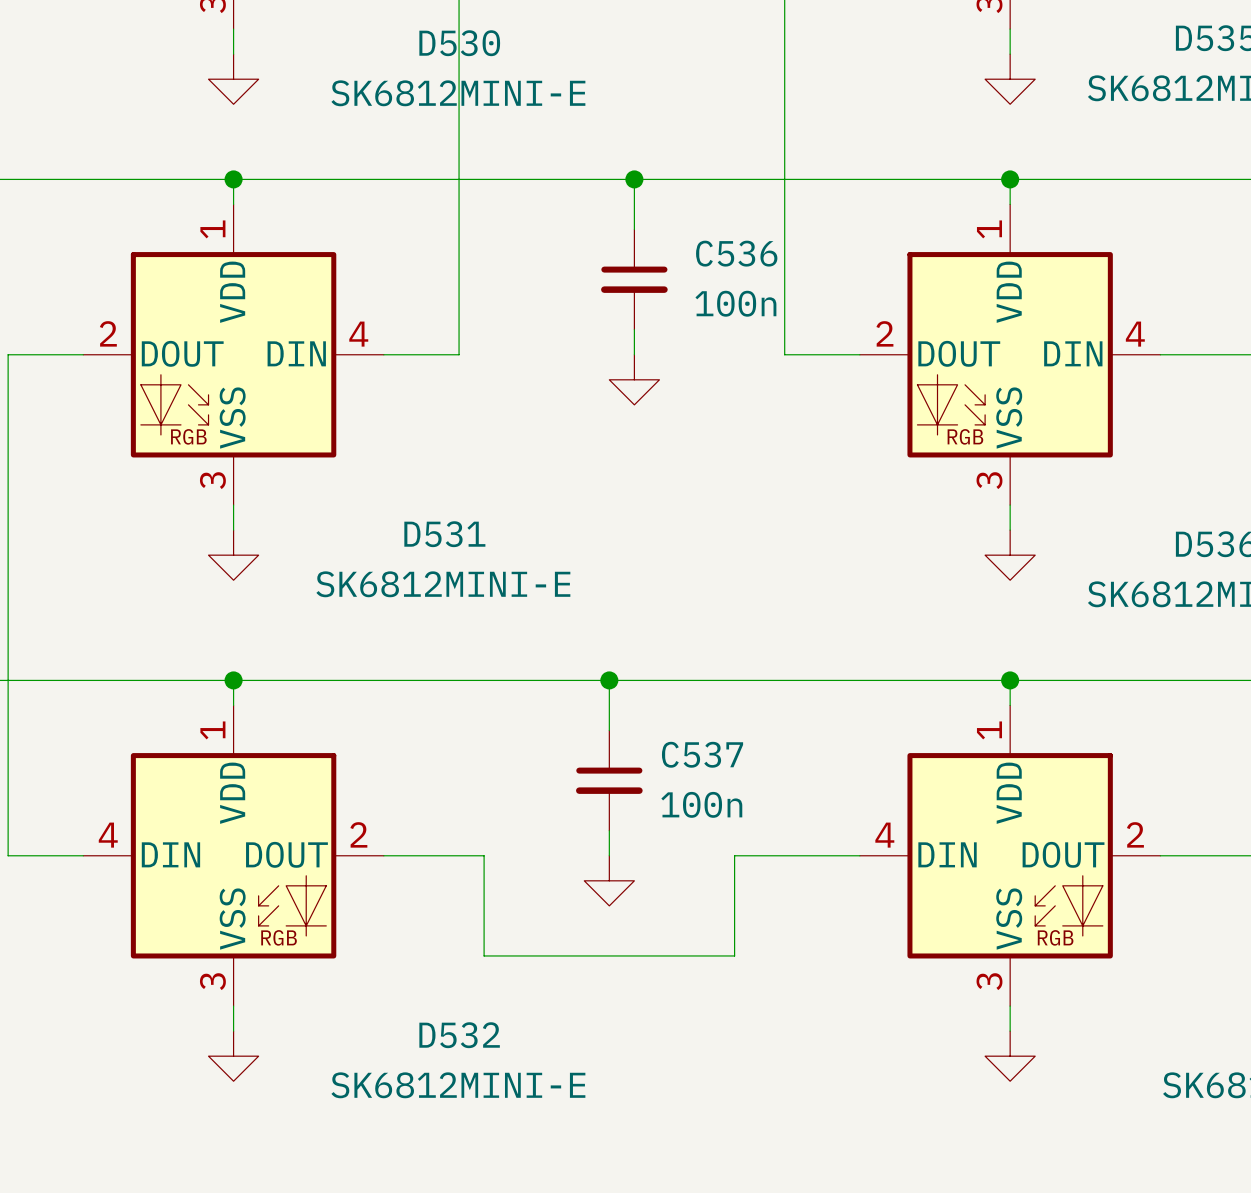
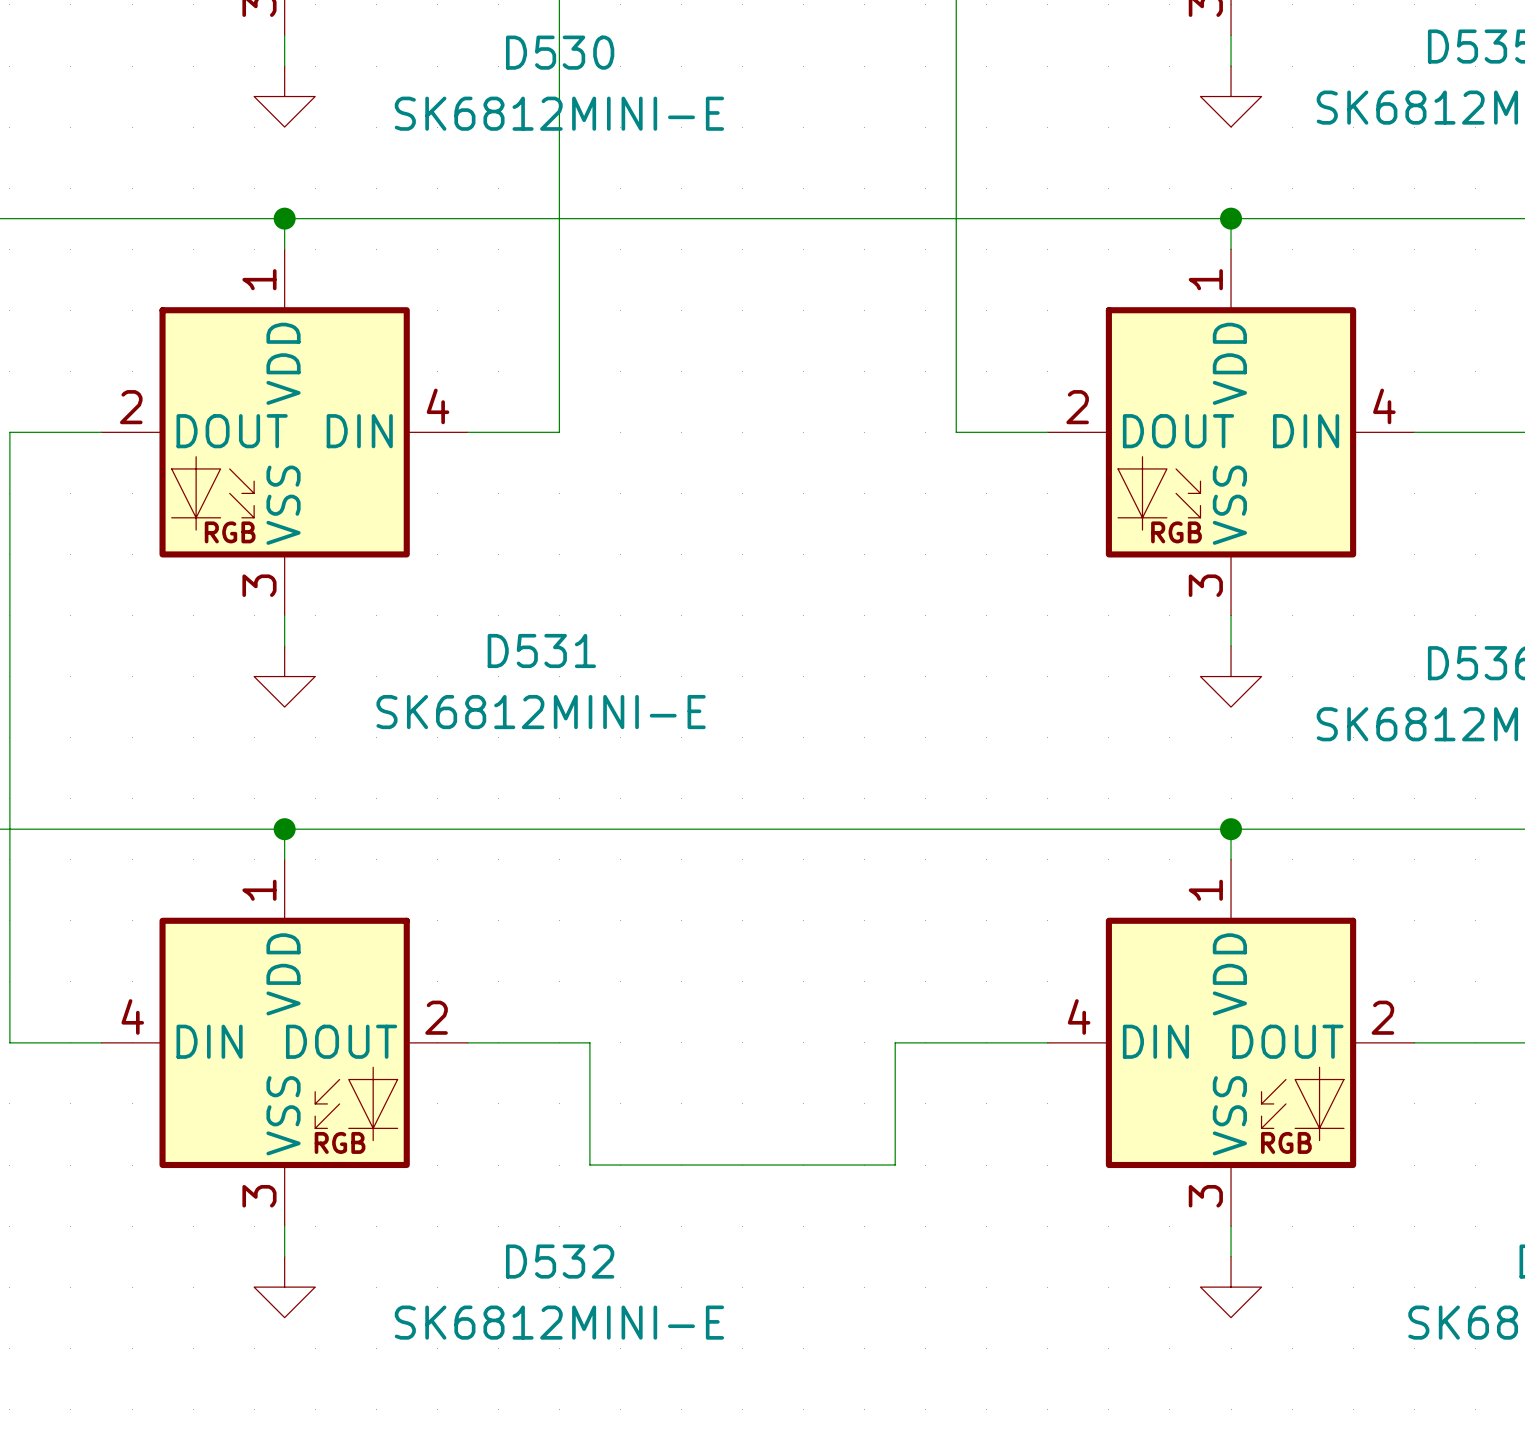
wire: (634, 179) (634, 229) -> none
junction: (634, 179) -> none
C536: 100n (634, 279) -> none
wire: (634, 329) (634, 354) -> none
power symbol: (634, 379) -> none
wire: (609, 680) (609, 730) -> none
junction: (609, 680) -> none
C537: 100n (609, 780) -> none
wire: (609, 830) (609, 855) -> none
power symbol: (609, 880) -> none

